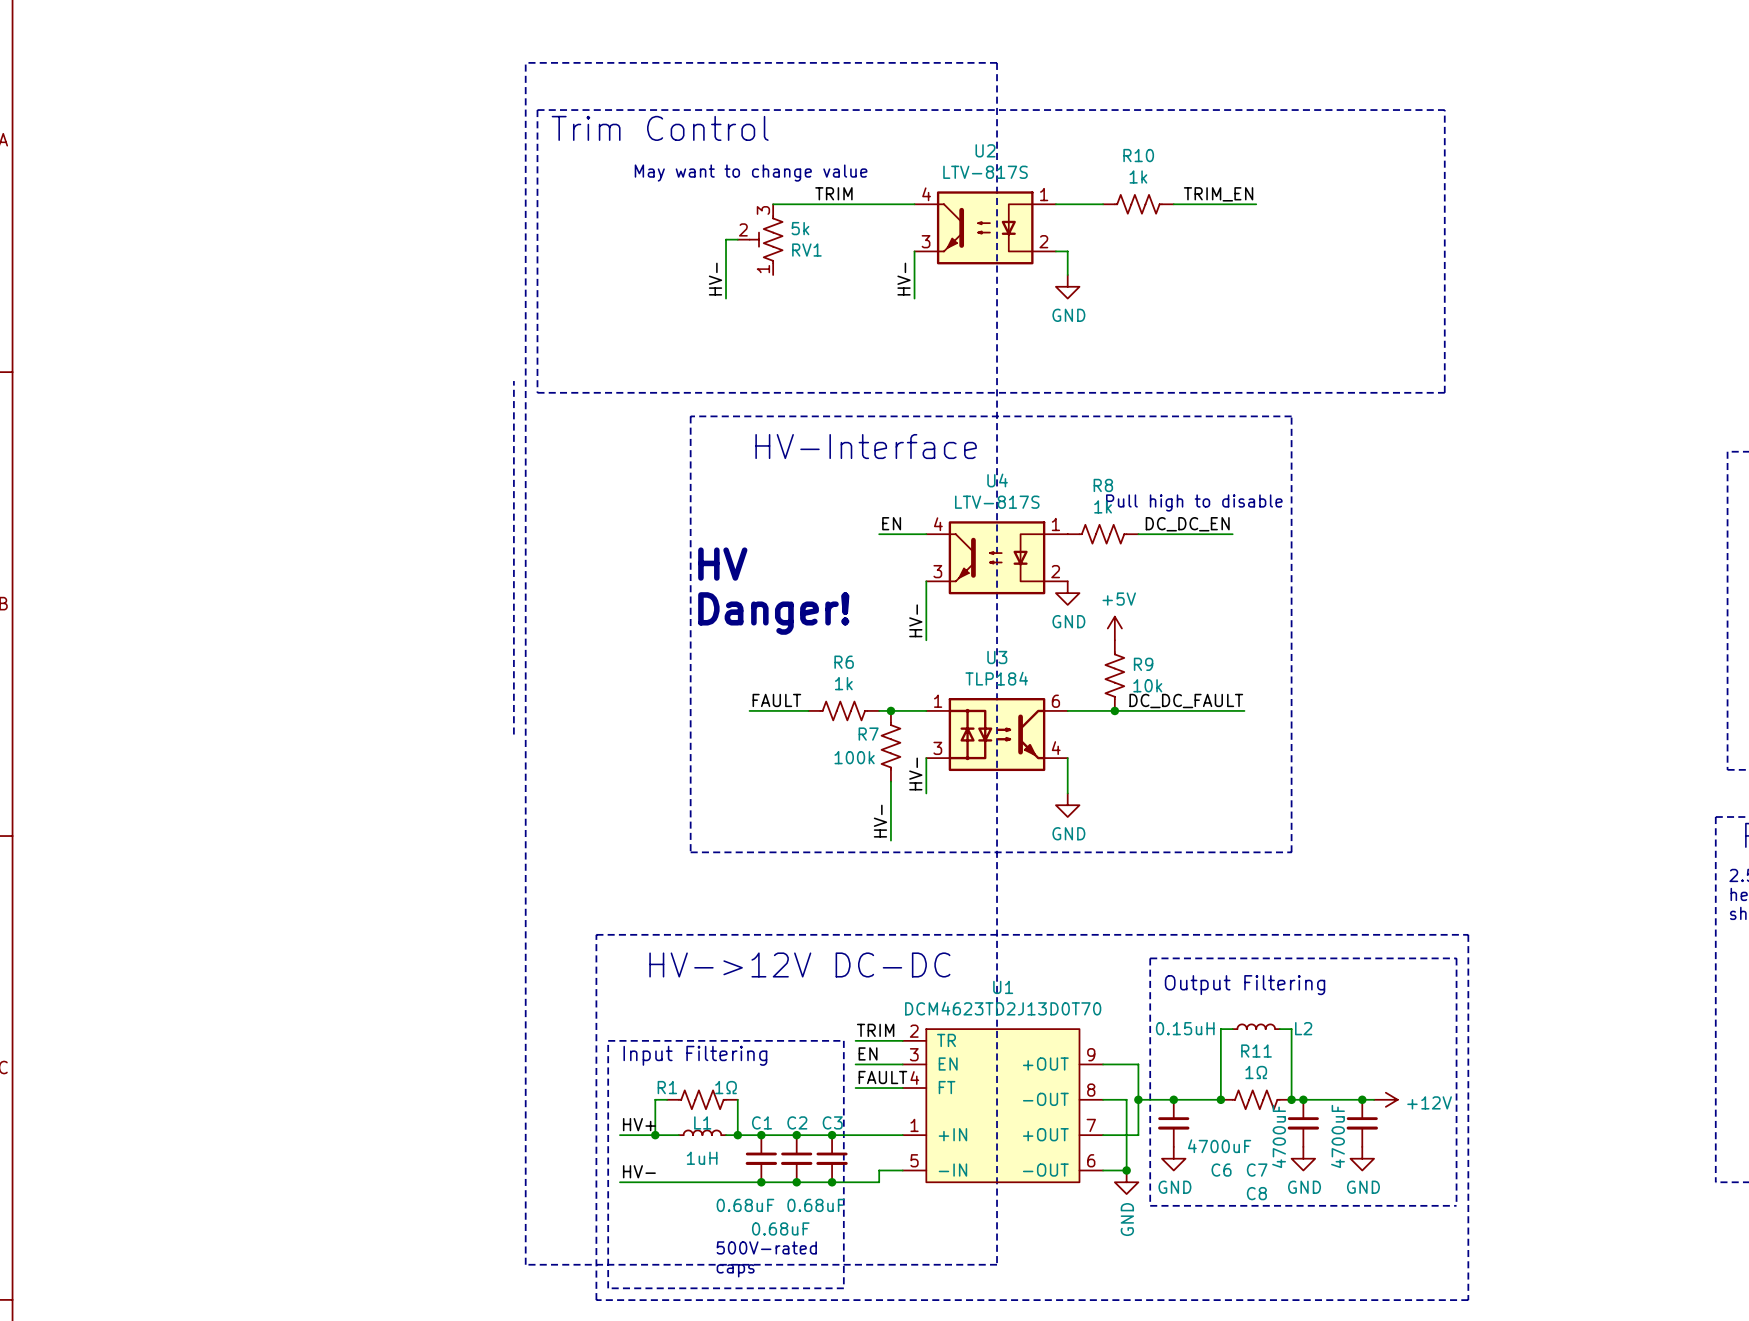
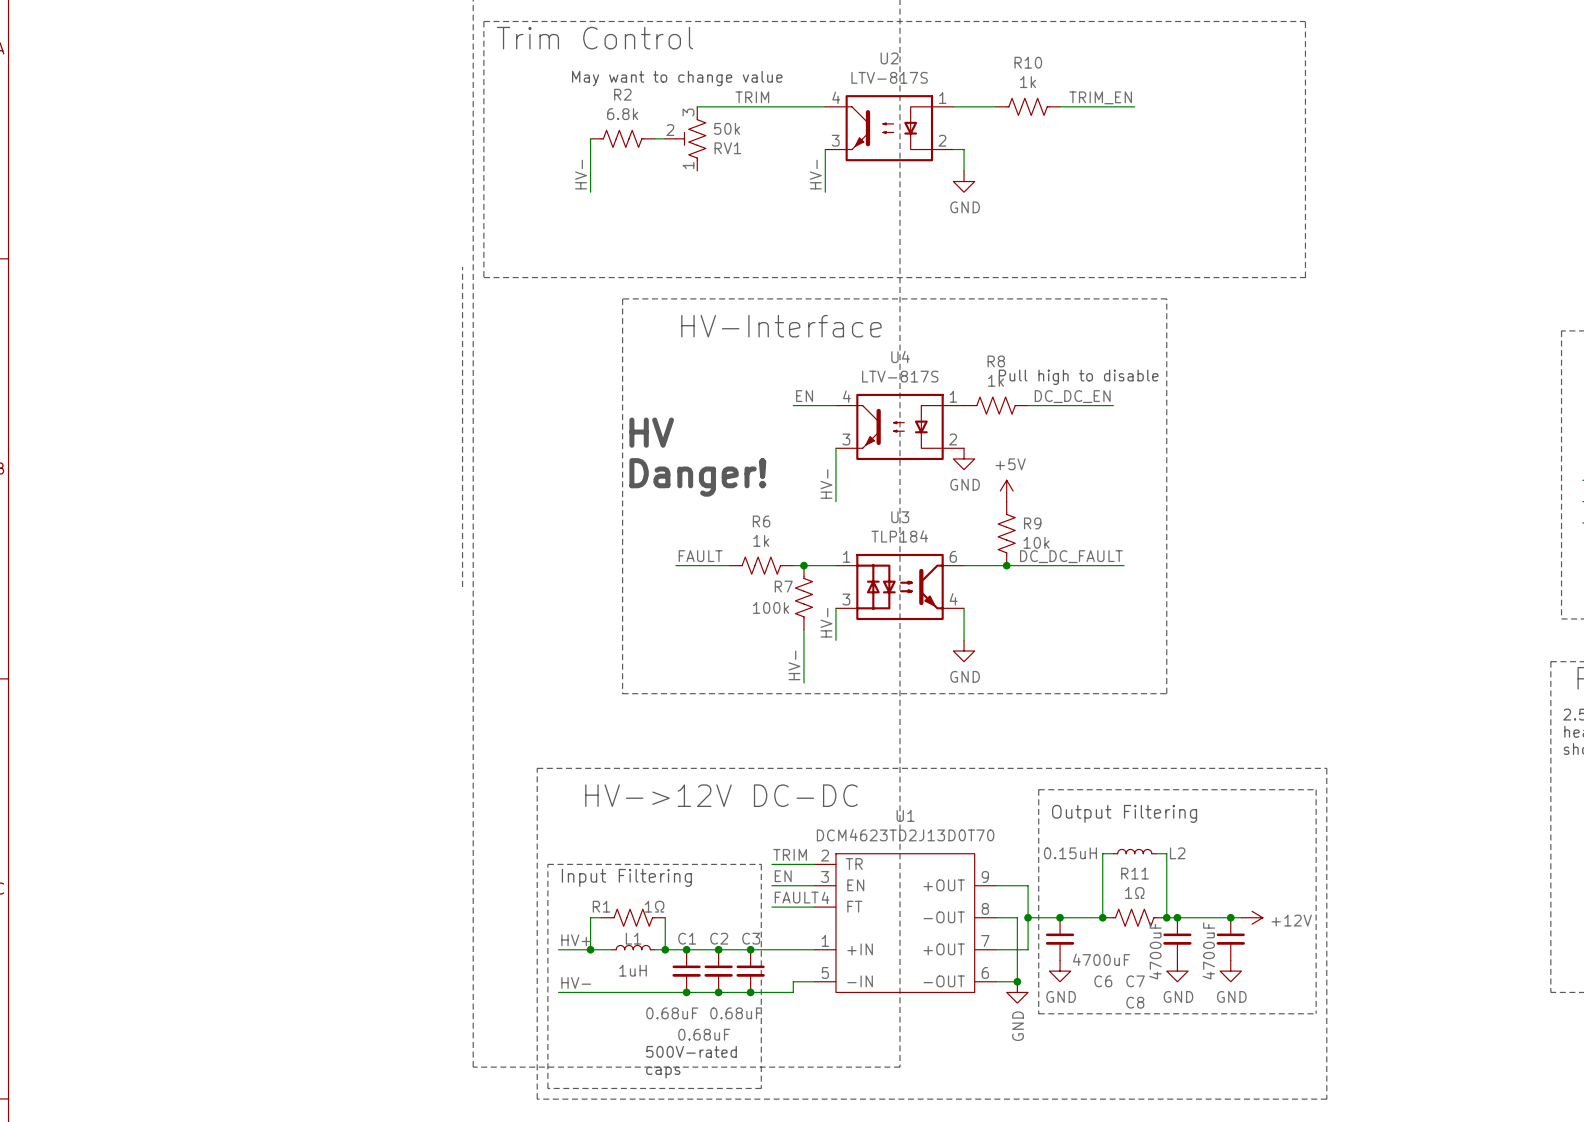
RV1 value: 5k (800, 228) -> 50k (727, 128)
R2: none -> 6.8k (622, 138)
wire: (726, 239) (726, 298) -> (590, 138) (590, 192)
label position: HV- (715, 279) -> HV- (581, 174)

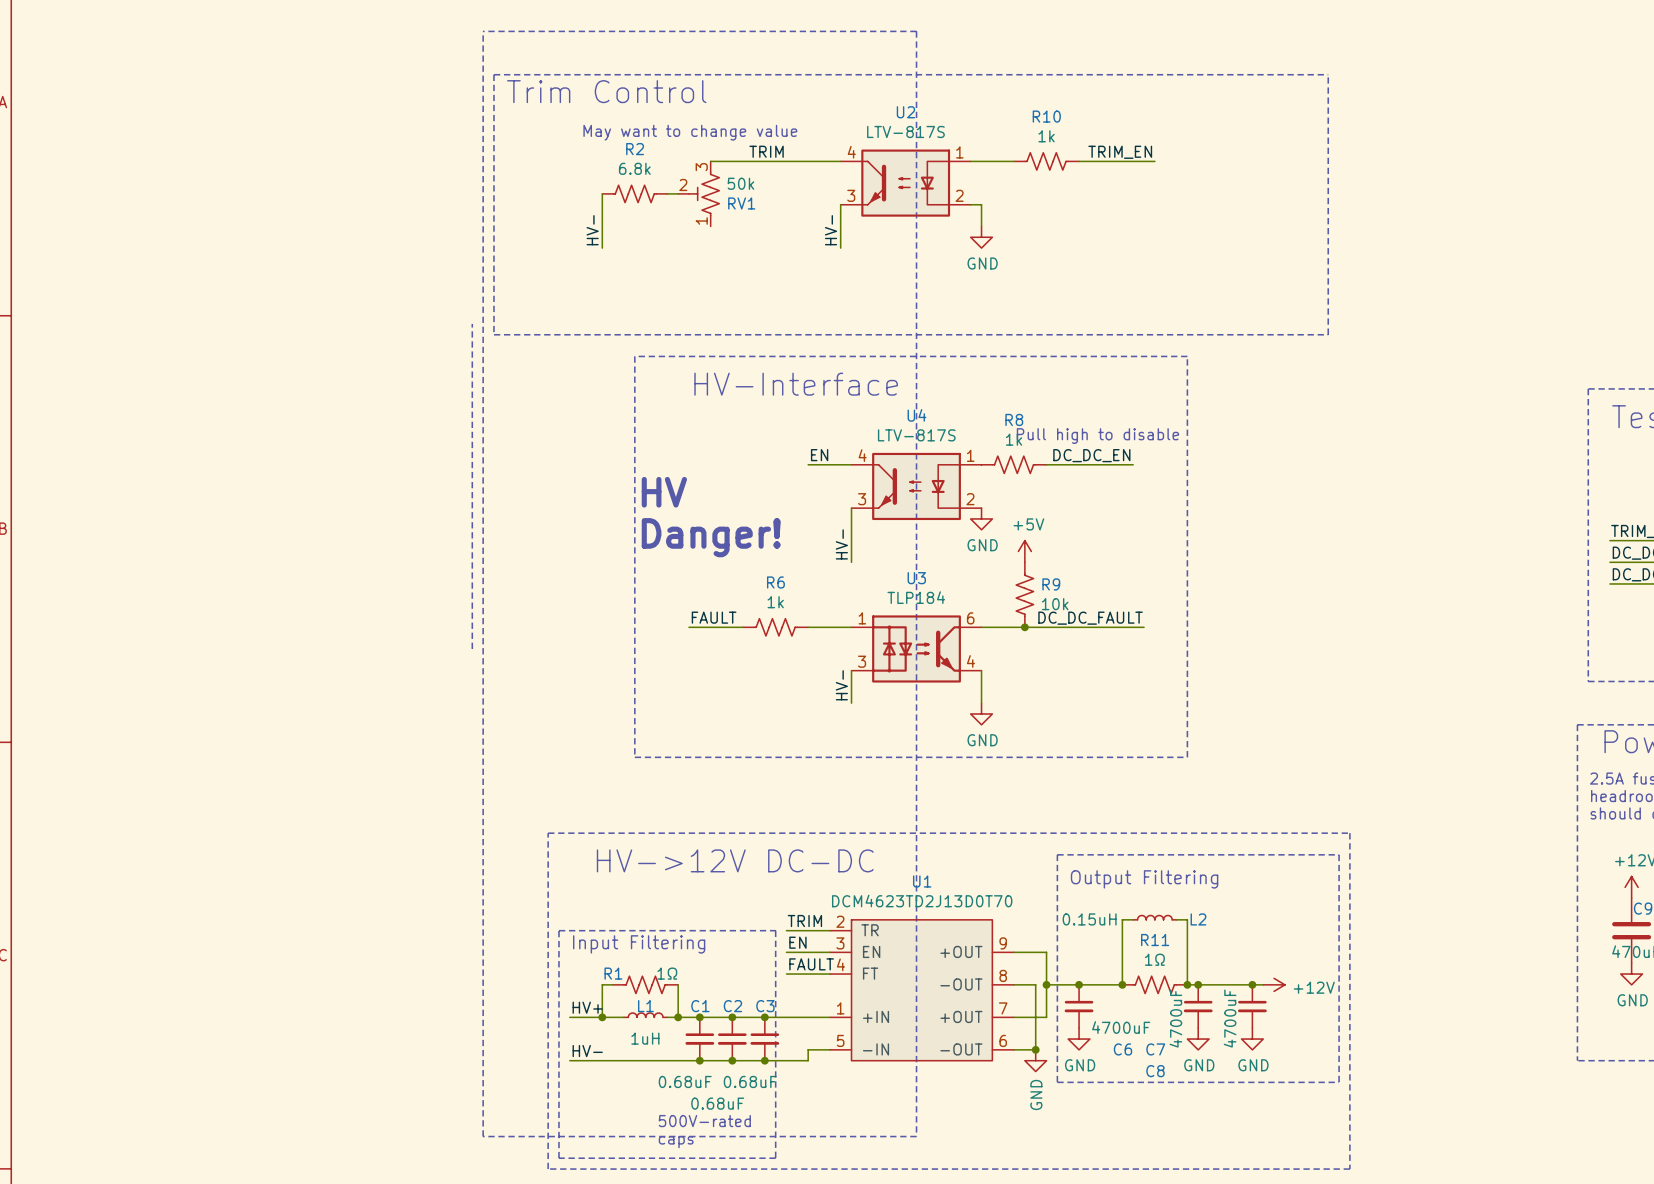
junction: (803, 565) -> none
R7: 100k (803, 597) -> none
wire: (803, 629) (803, 683) -> none
label: HV- (794, 665) -> none

